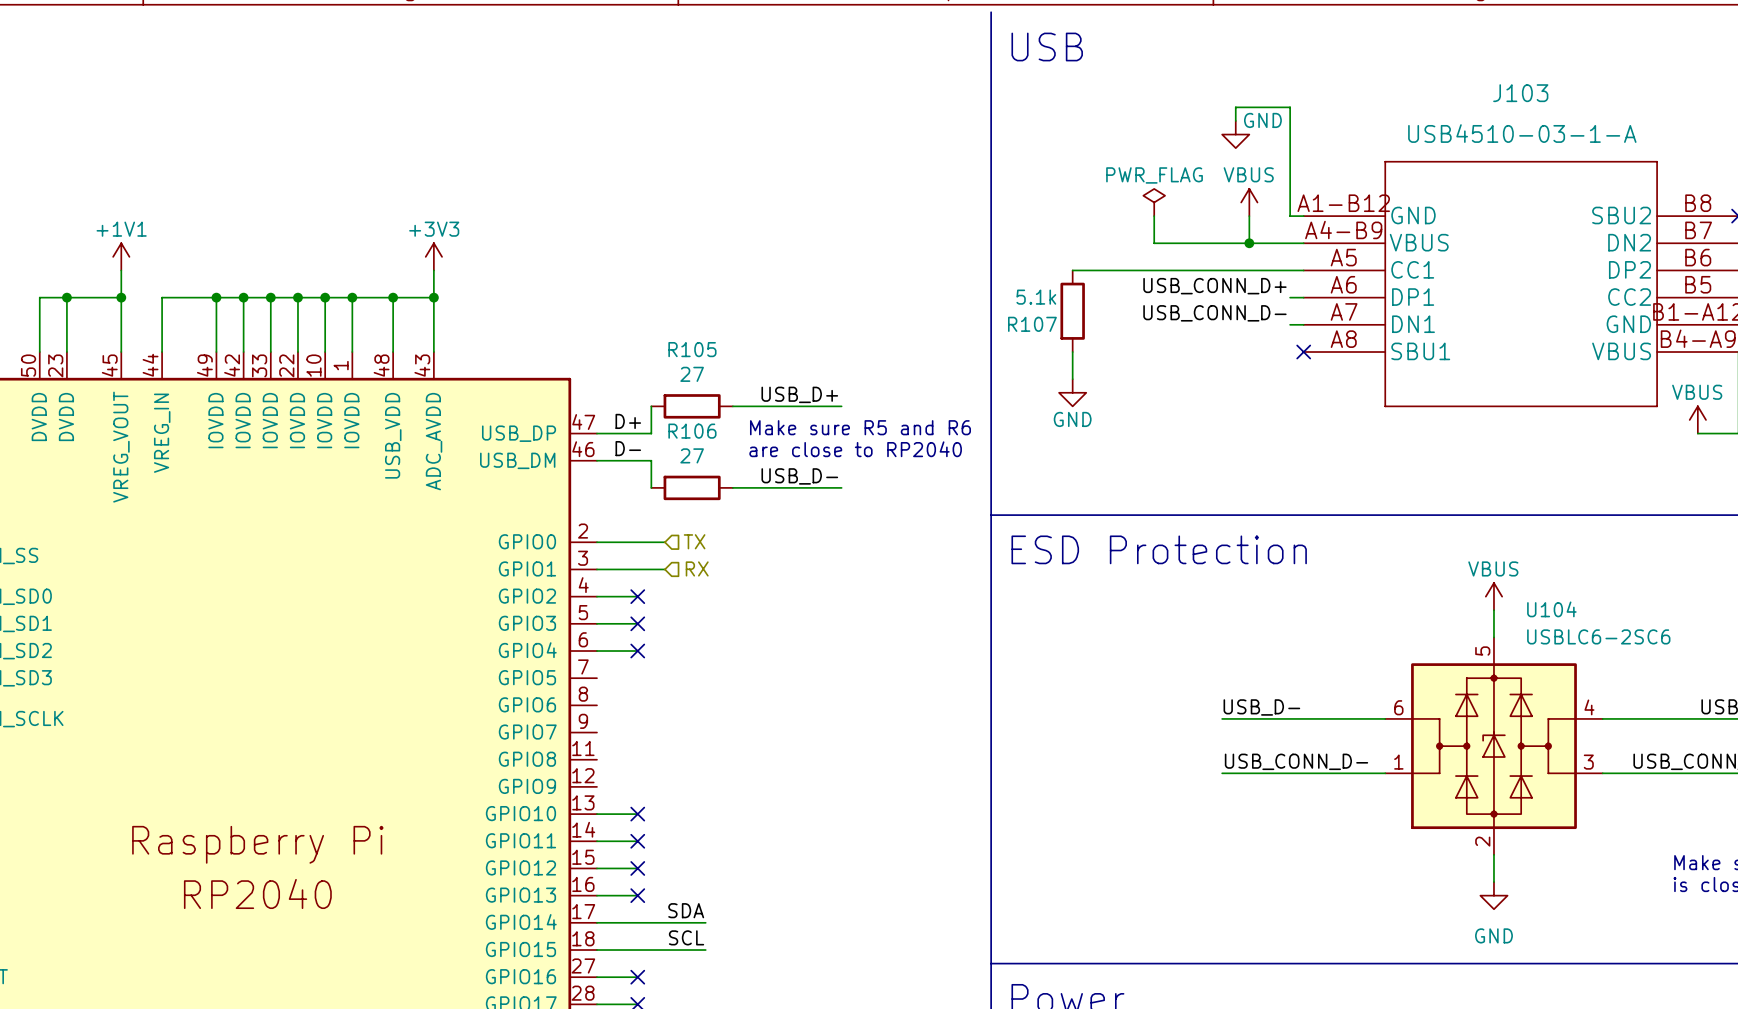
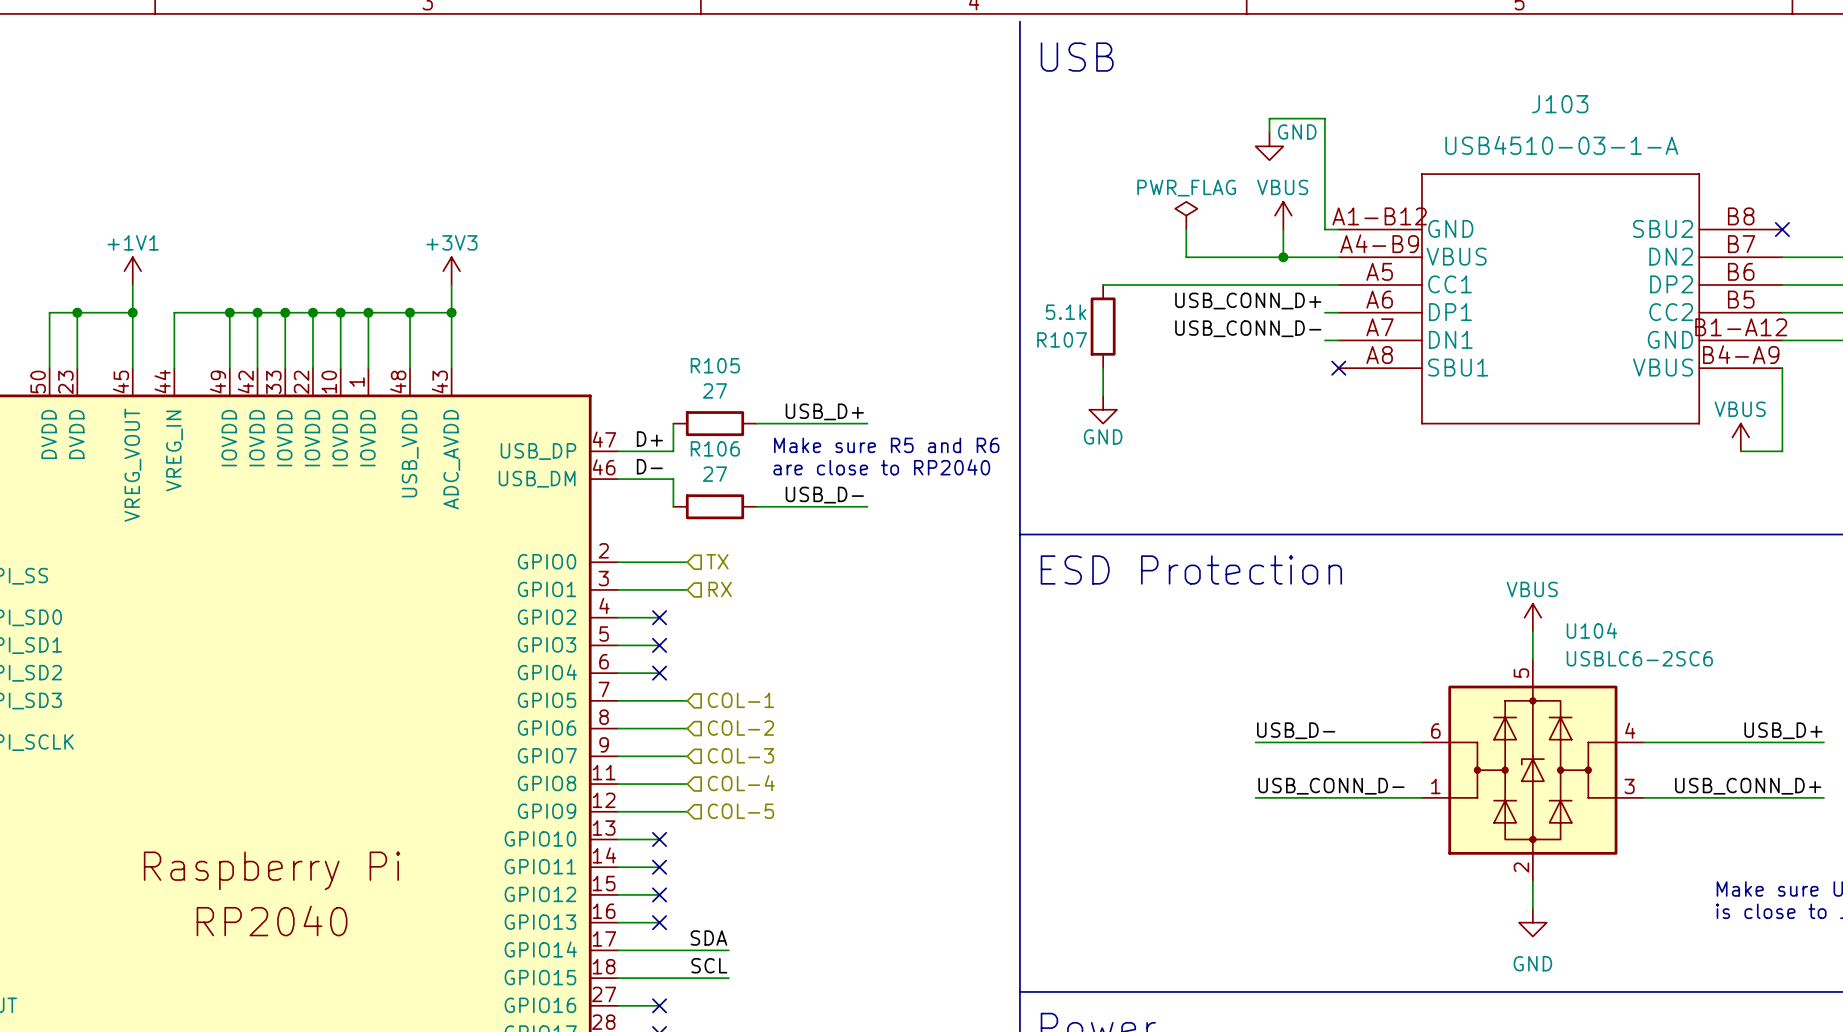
hierarchical label: none -> COL-1 (740, 700)
wire: none -> (617, 700) (687, 700)
hierarchical label: none -> COL-2 (740, 728)
wire: none -> (617, 728) (687, 728)
wire: none -> (617, 756) (687, 756)
hierarchical label: none -> COL-3 (740, 755)
hierarchical label: none -> COL-4 (741, 783)
wire: none -> (617, 784) (687, 784)
wire: none -> (617, 811) (687, 811)
hierarchical label: none -> COL-5 (740, 811)

